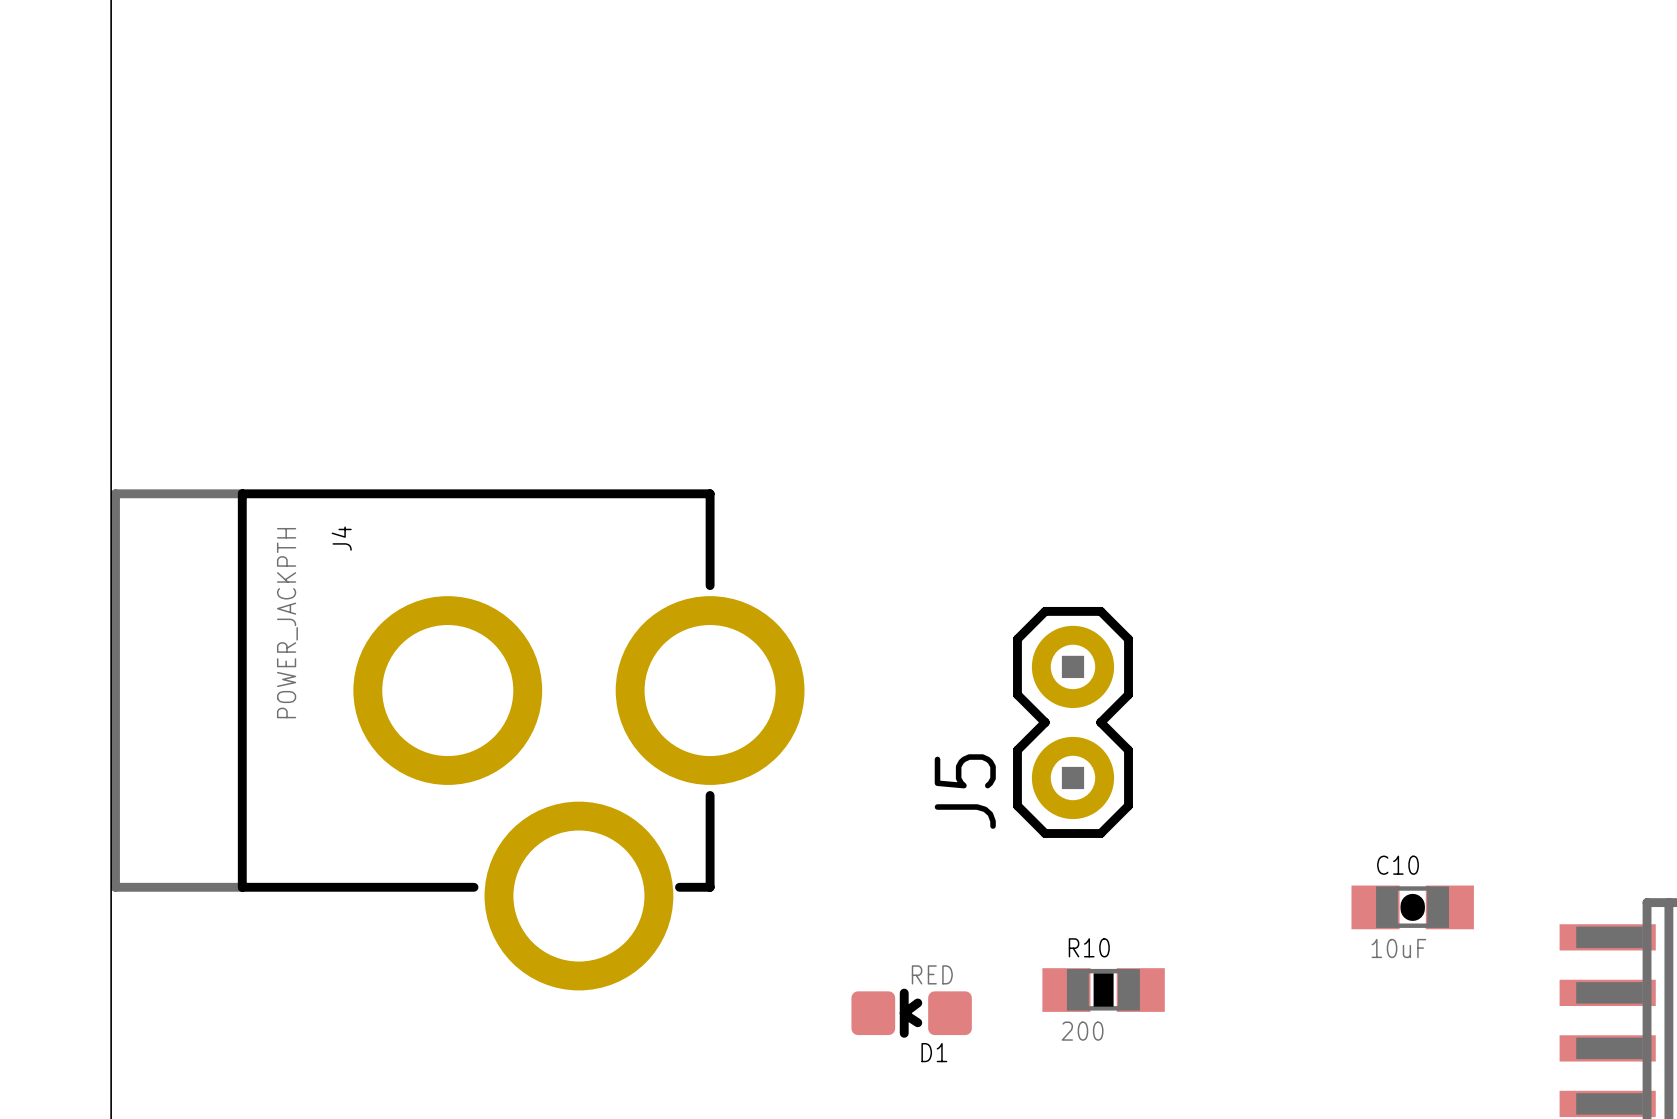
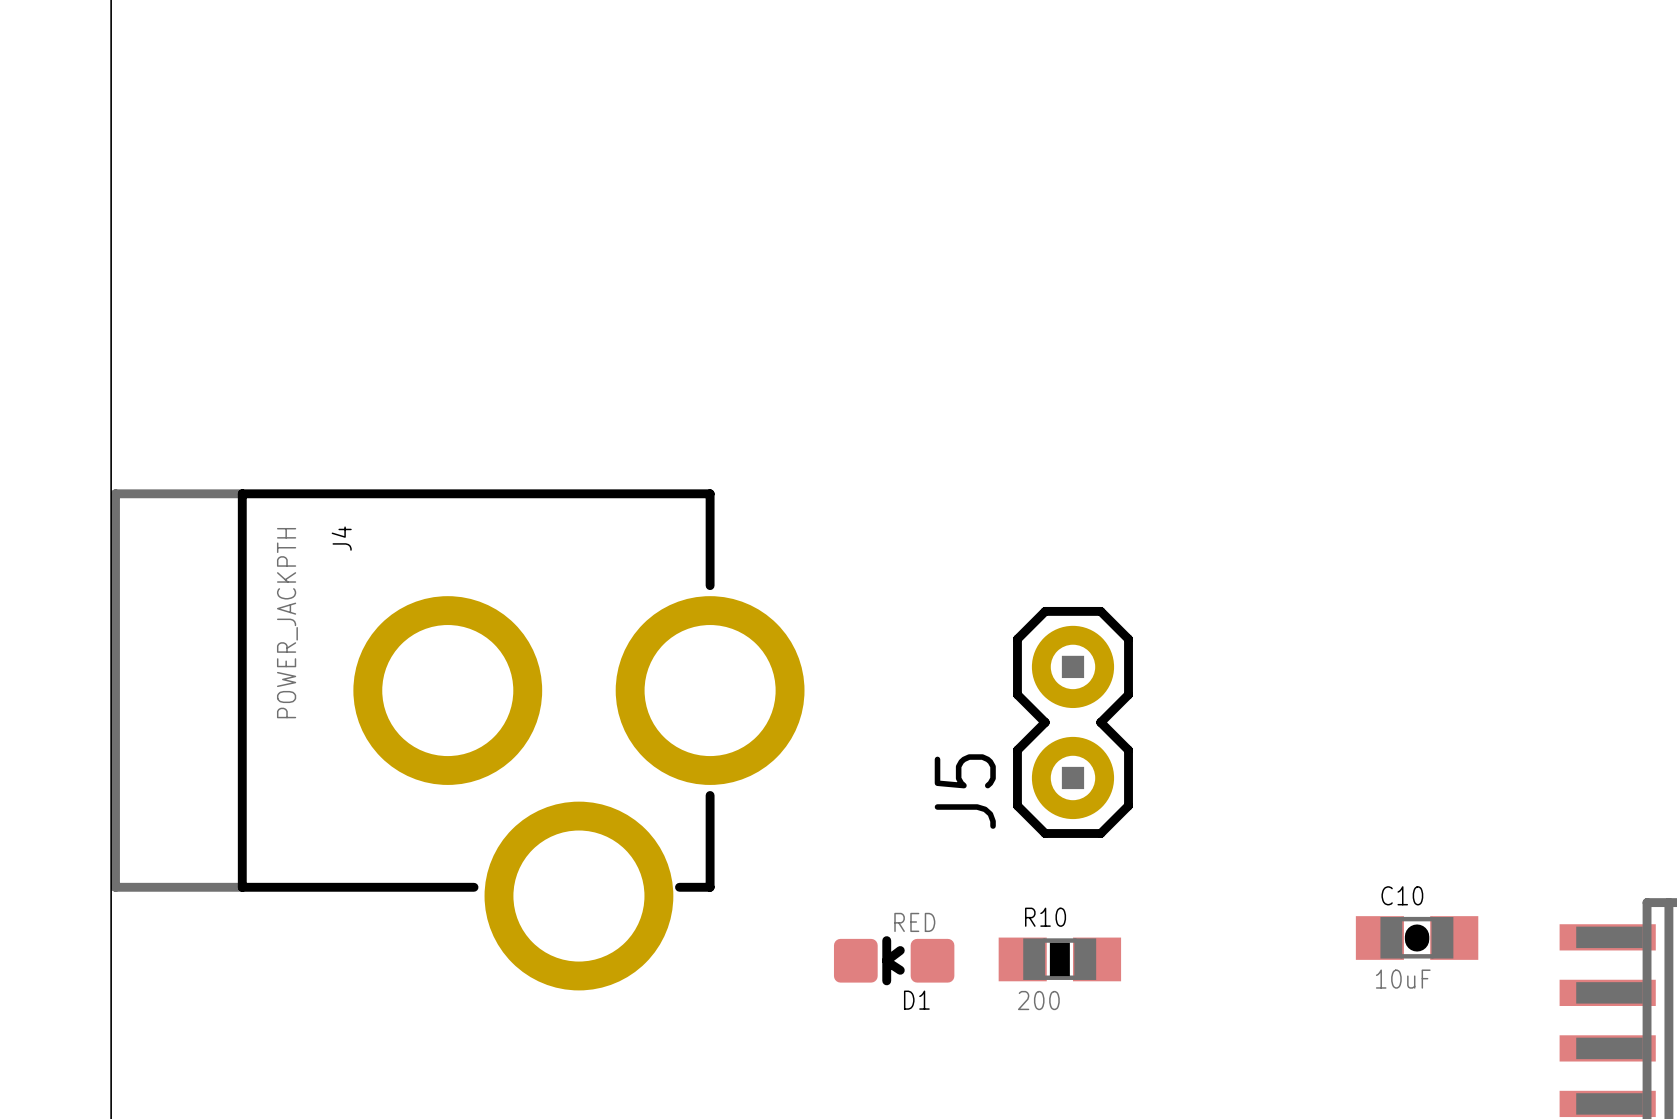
C10 position: (1412, 907) -> (1417, 938)
R10 position: (1103, 990) -> (1059, 959)
D1 position: (911, 1013) -> (894, 960)

